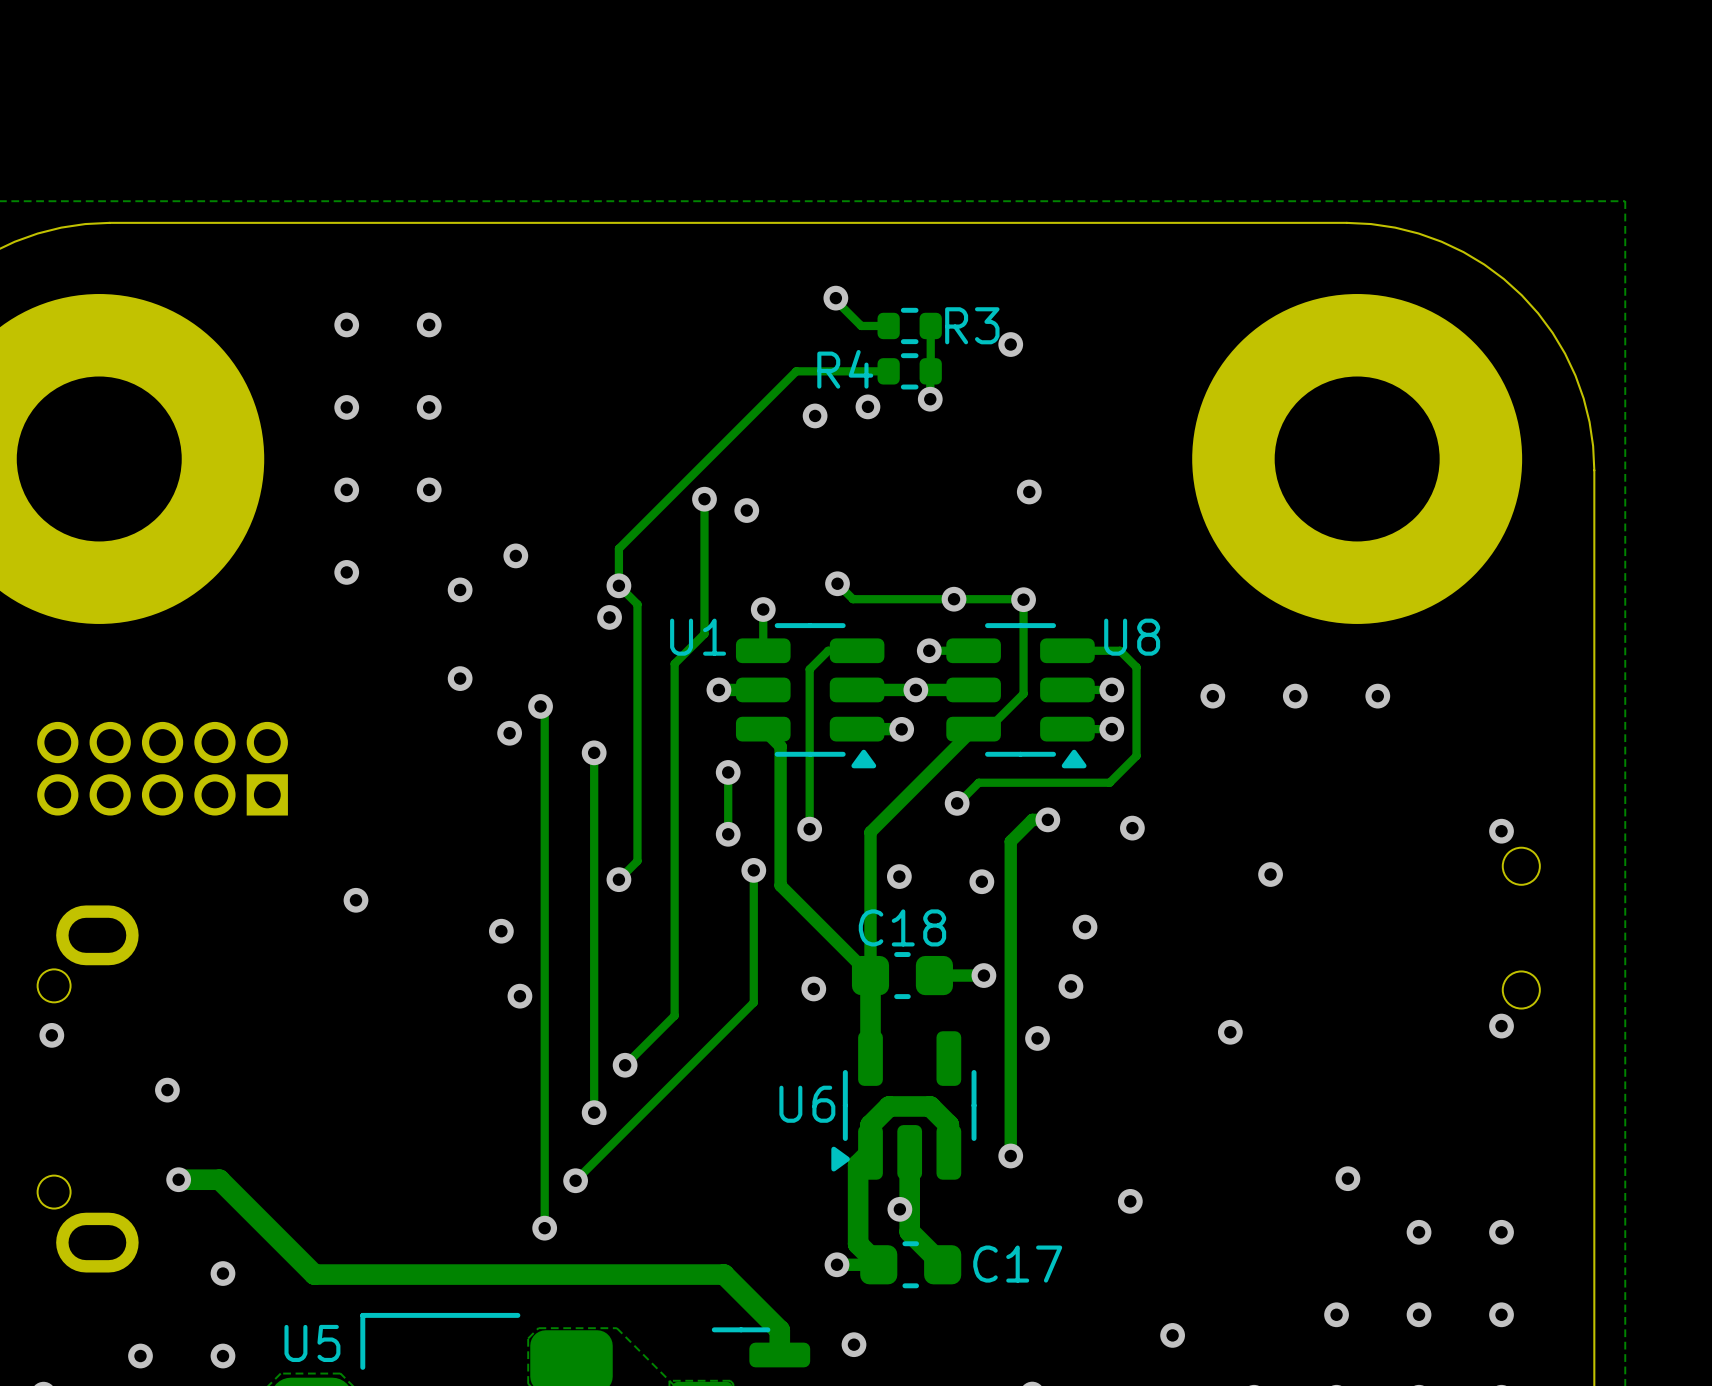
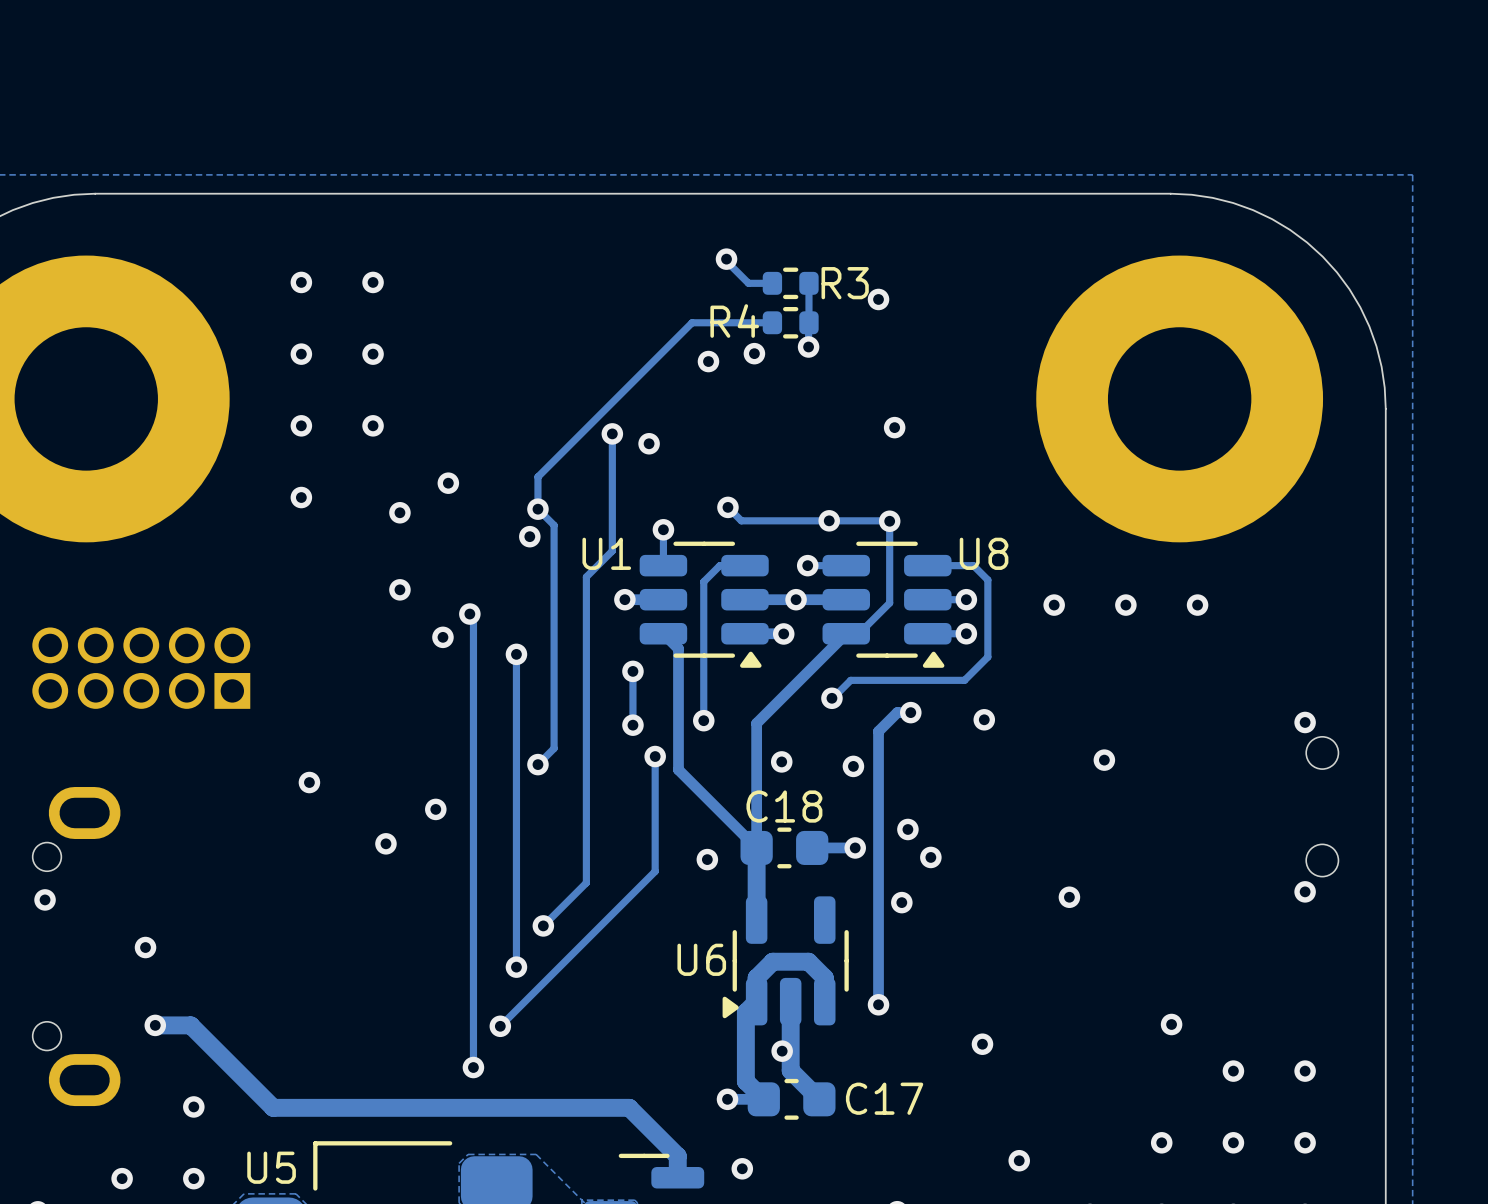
via position: (1084, 927) -> (907, 829)
via position: (519, 996) -> (385, 843)

